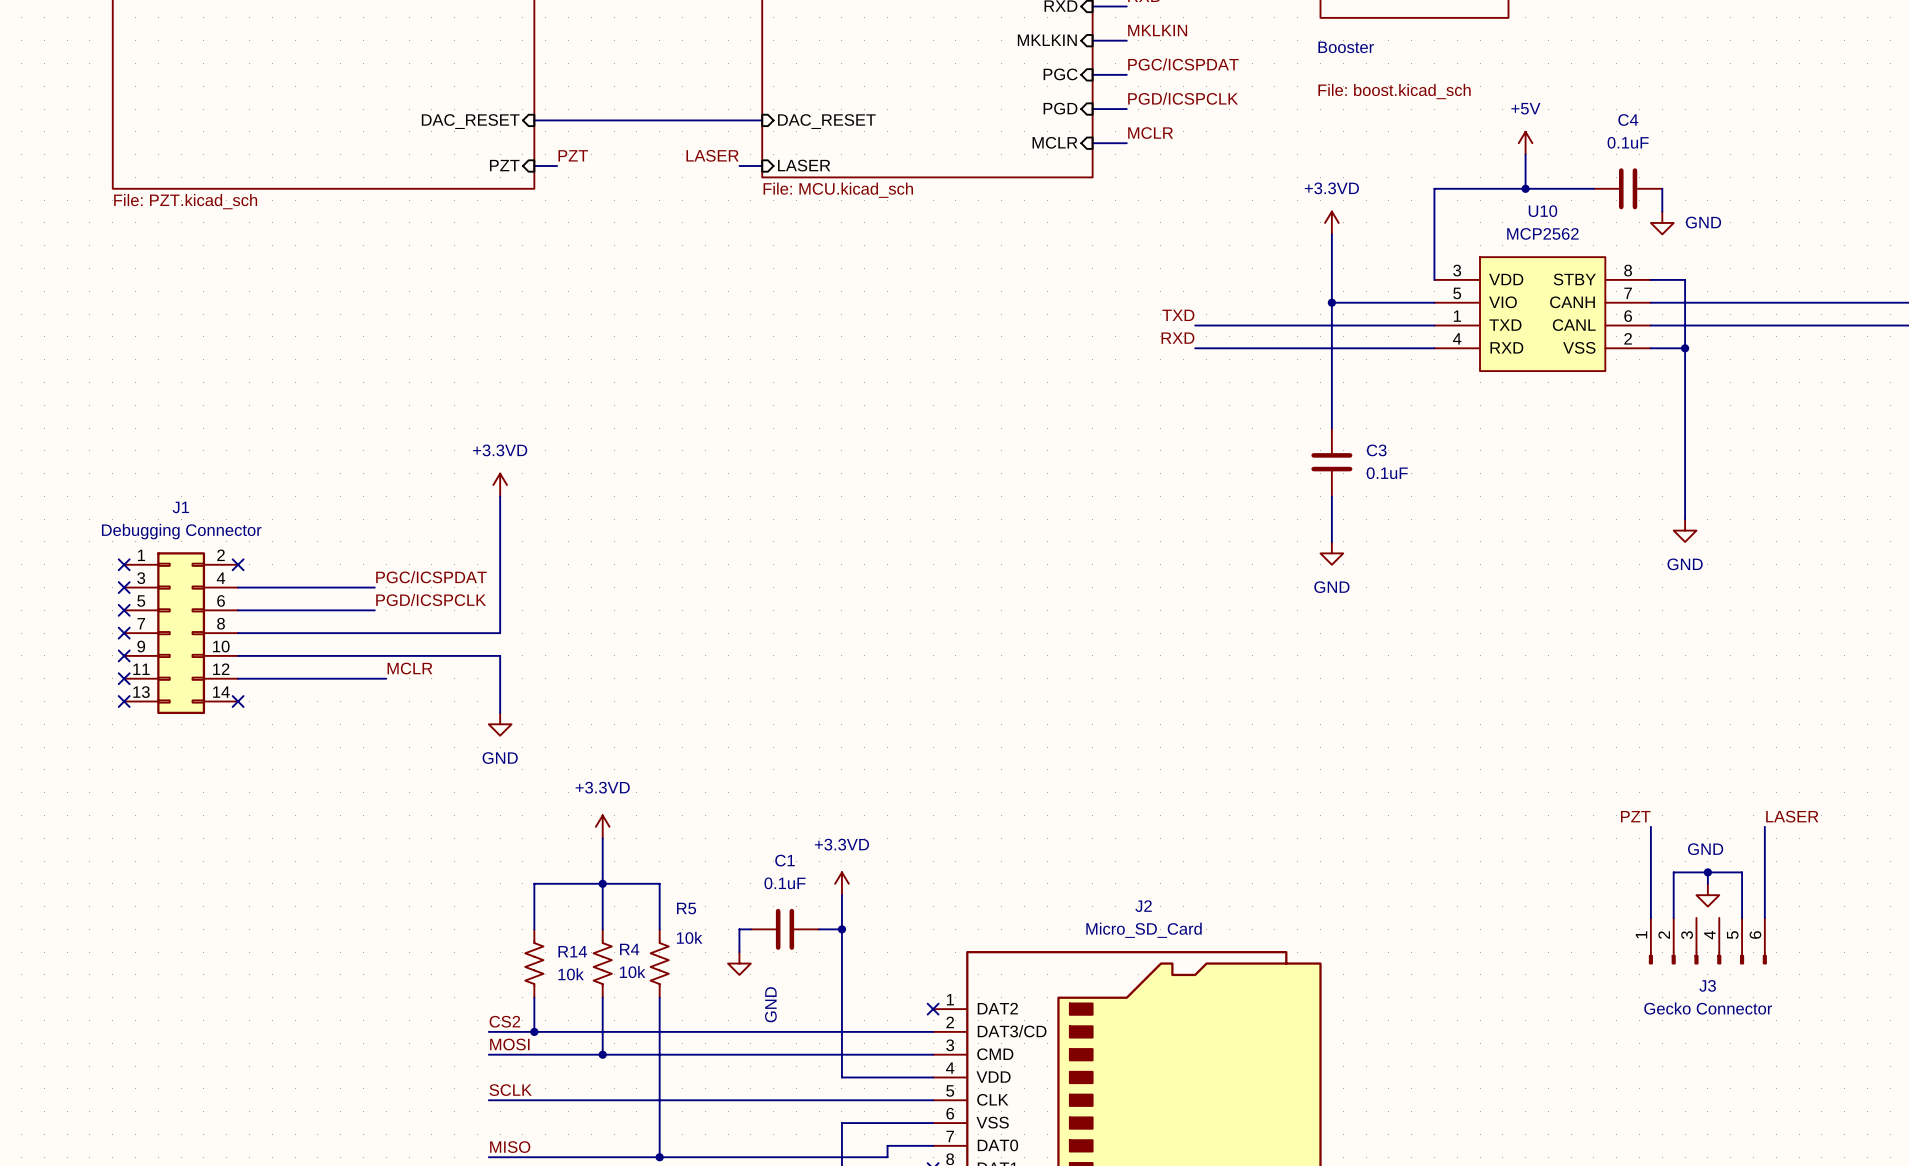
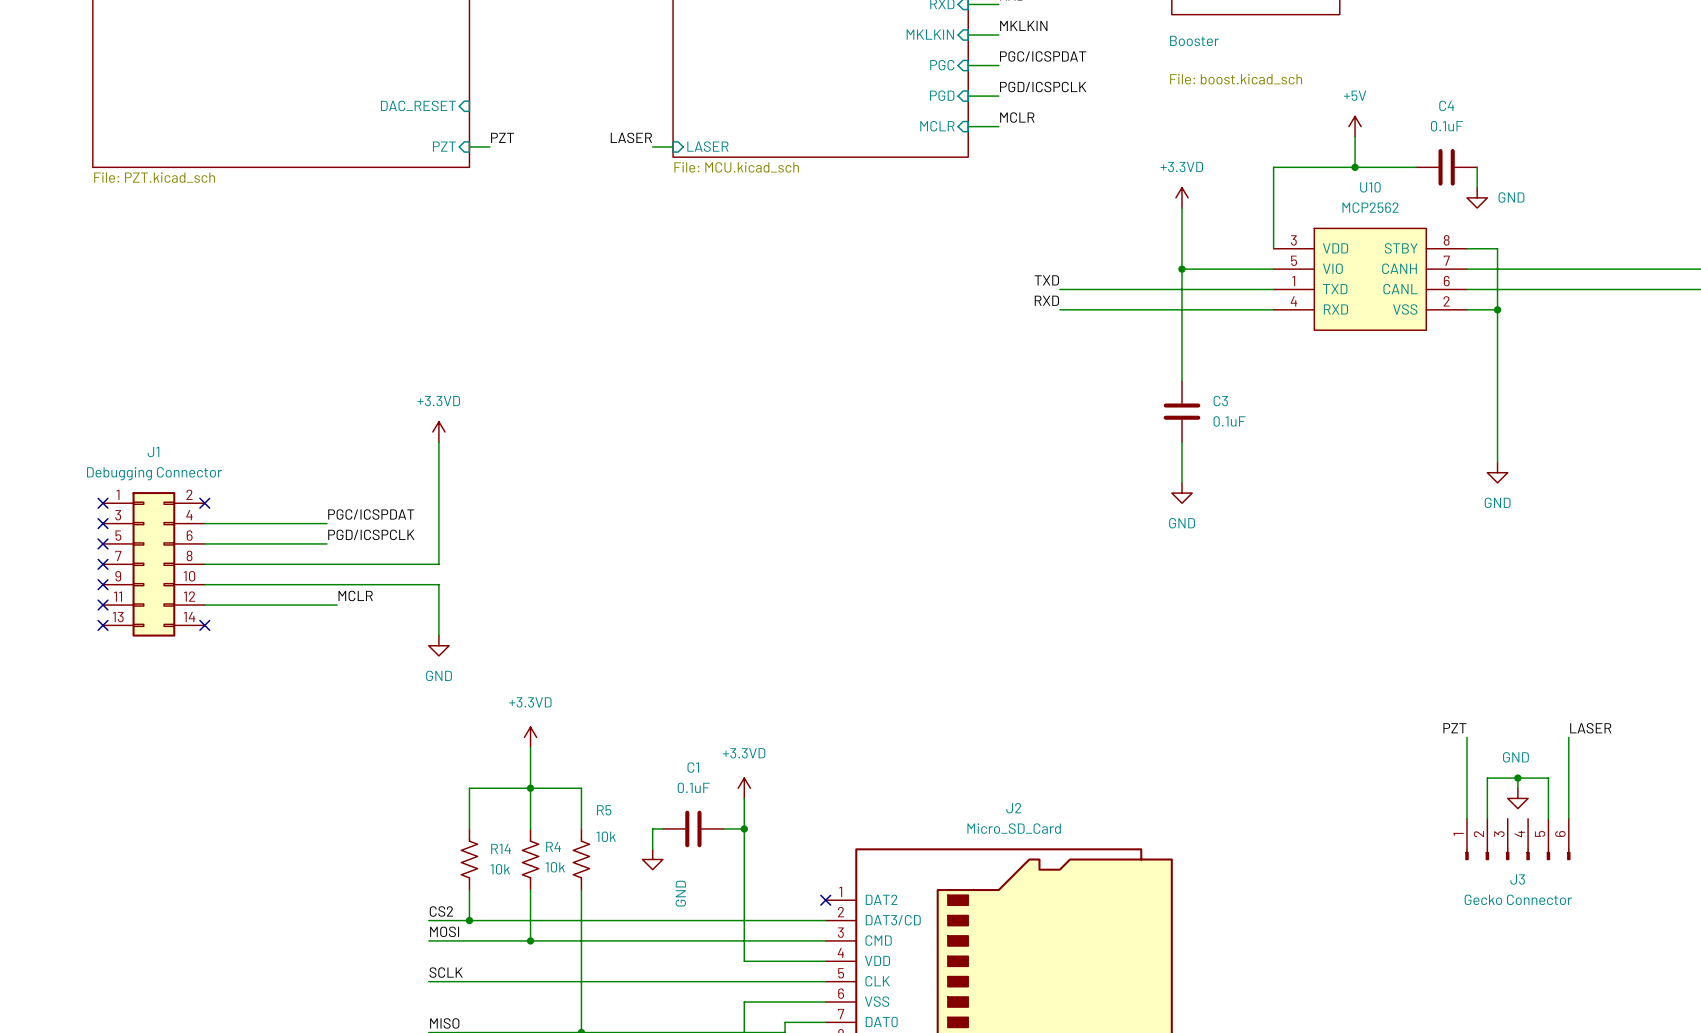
wire: (534, 120) (762, 120) -> none
sheet pin: DAC_RESET (826, 121) -> none

